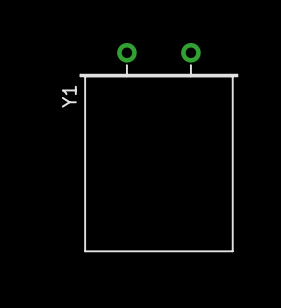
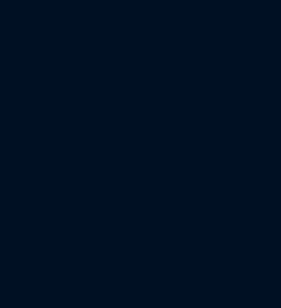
Y1: (158, 147) -> none

